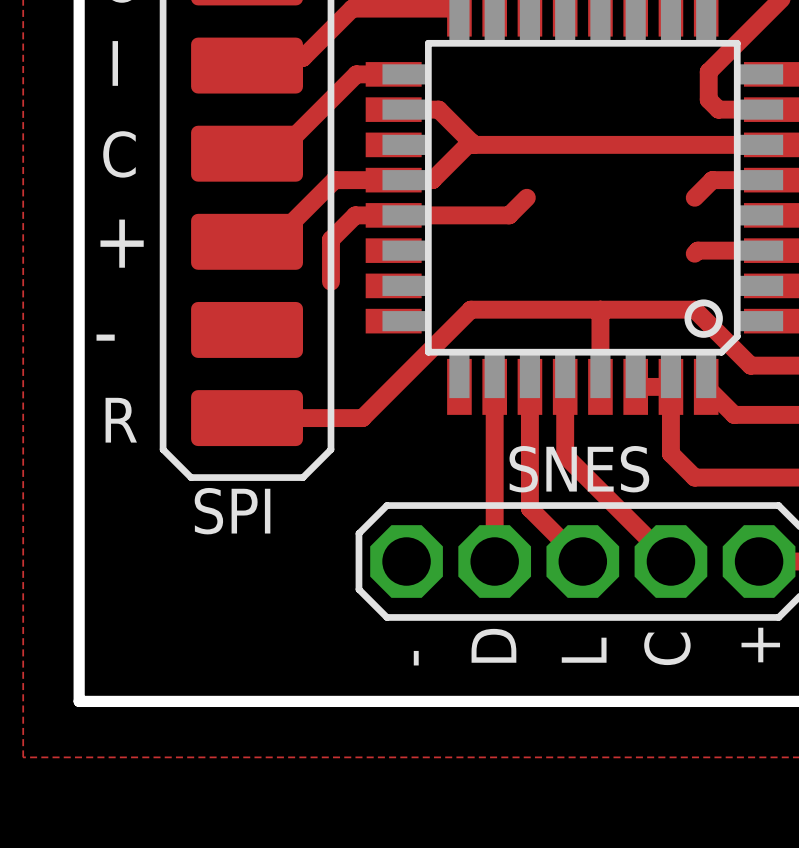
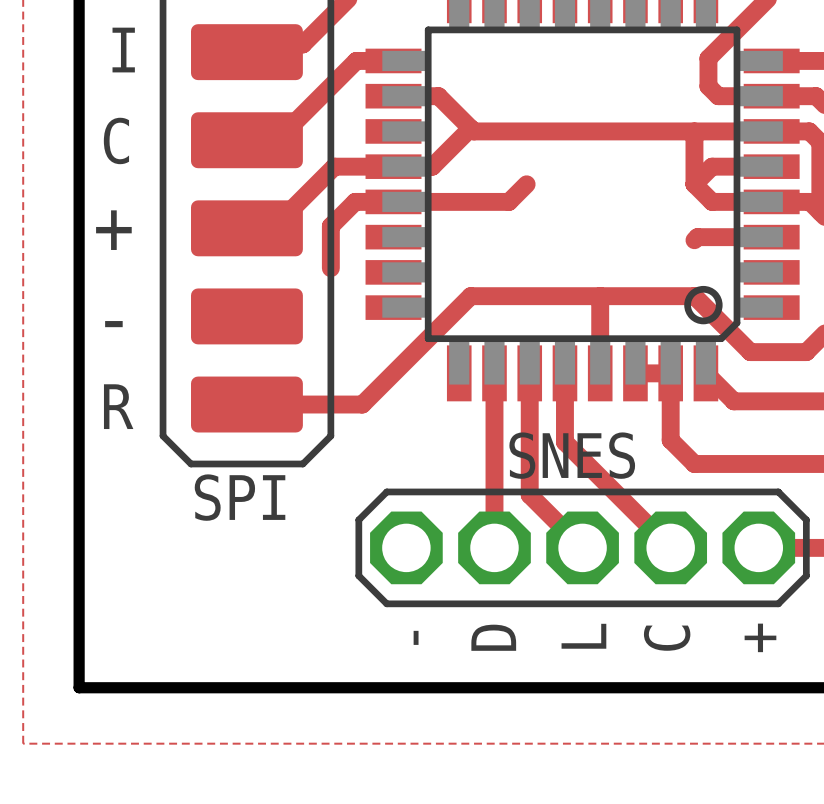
top track: none -> (694, 131) (694, 184) (712, 201) (771, 201)

